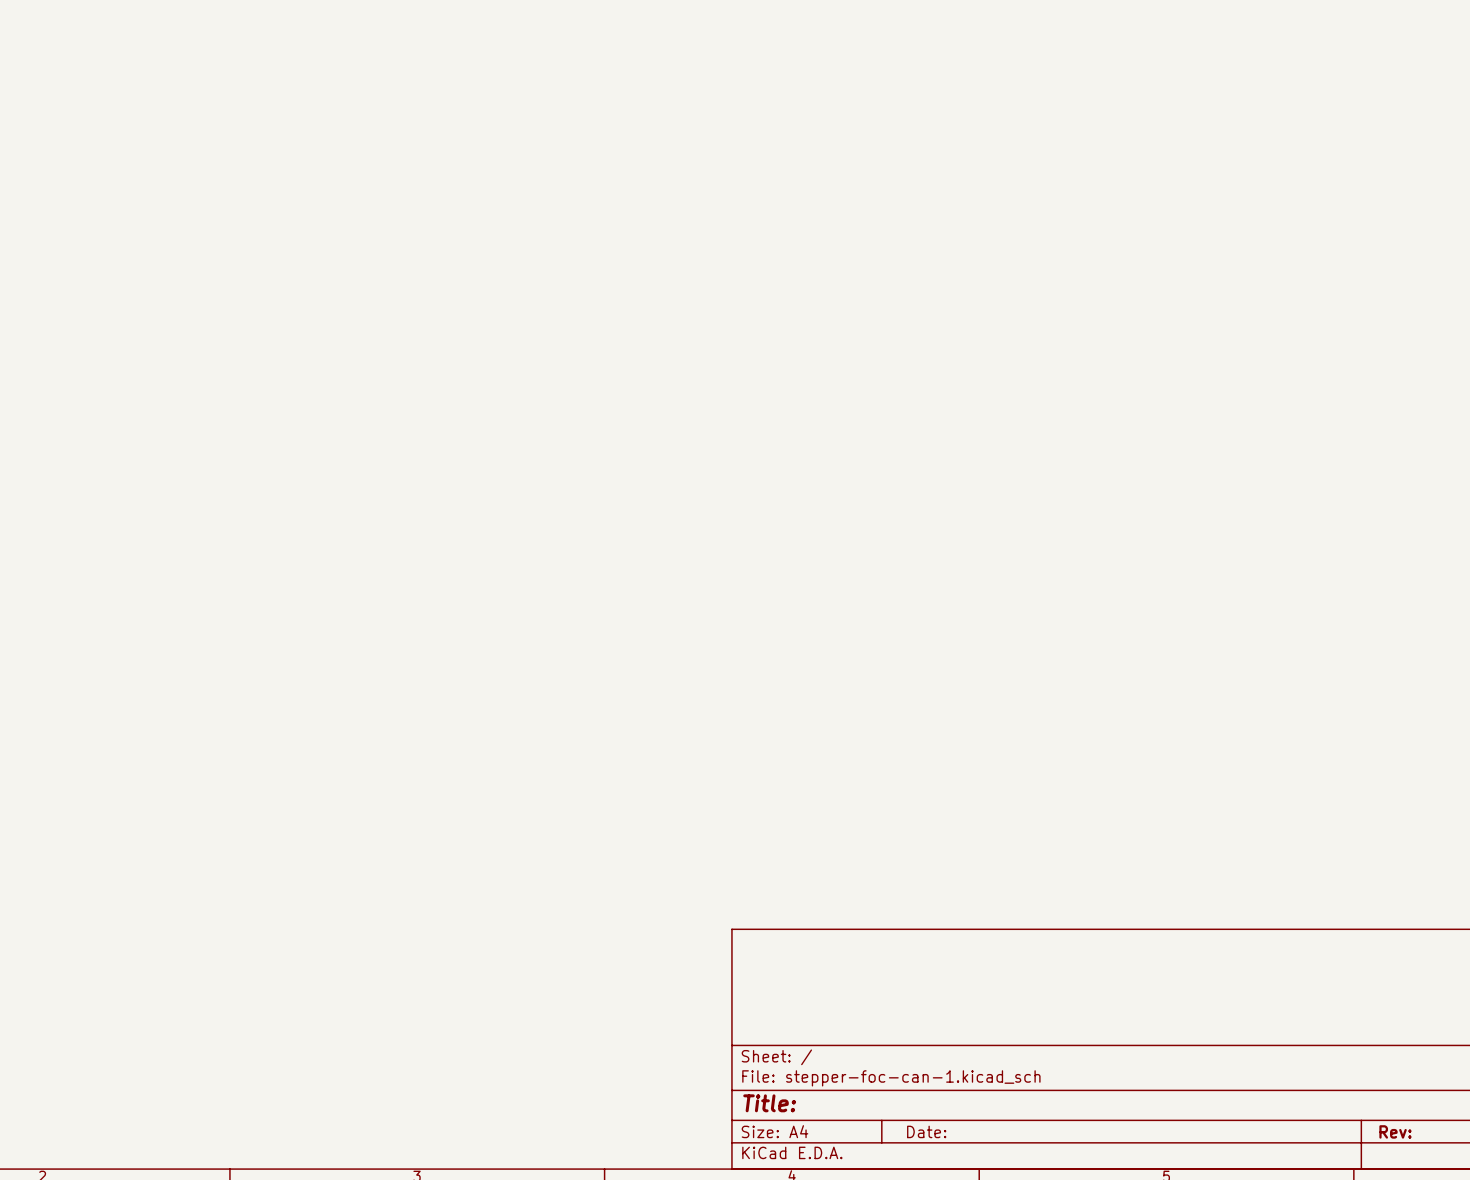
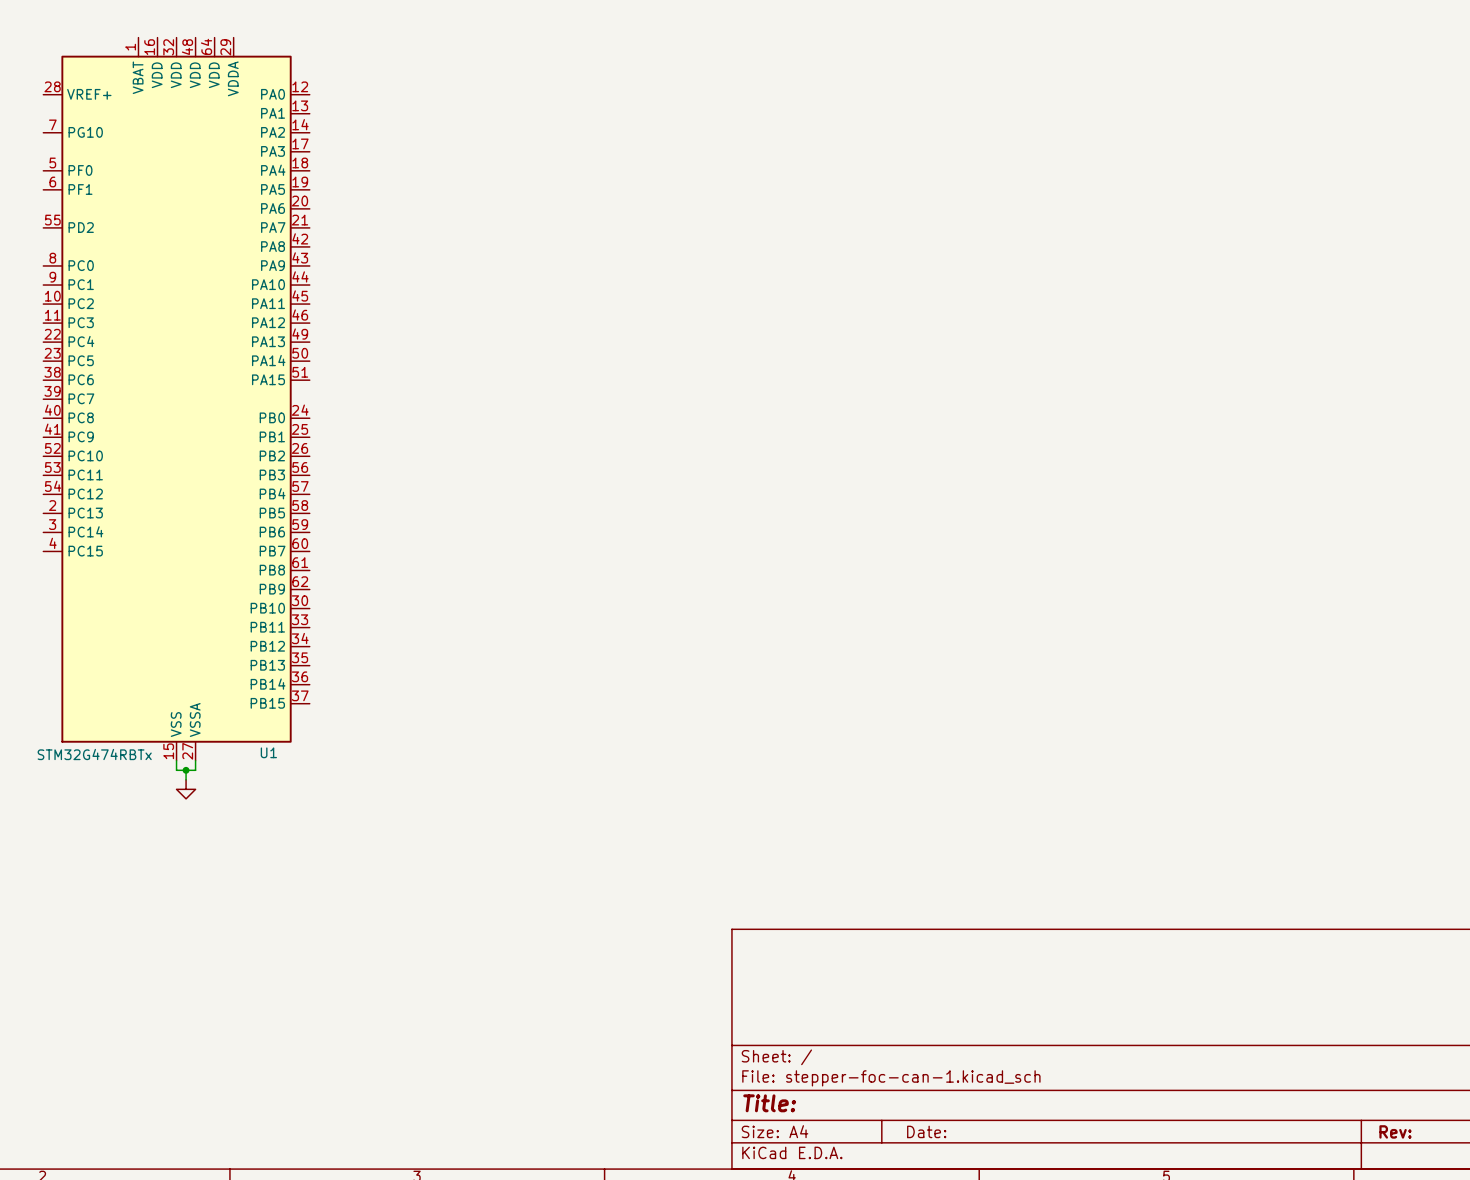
U1: none -> STM32G474RBTx (176, 399)
wire: none -> (176, 760) (176, 770) (195, 770) (195, 760)
wire: none -> (186, 770) (186, 779)
junction: none -> (186, 770)
power symbol: none -> (186, 789)

